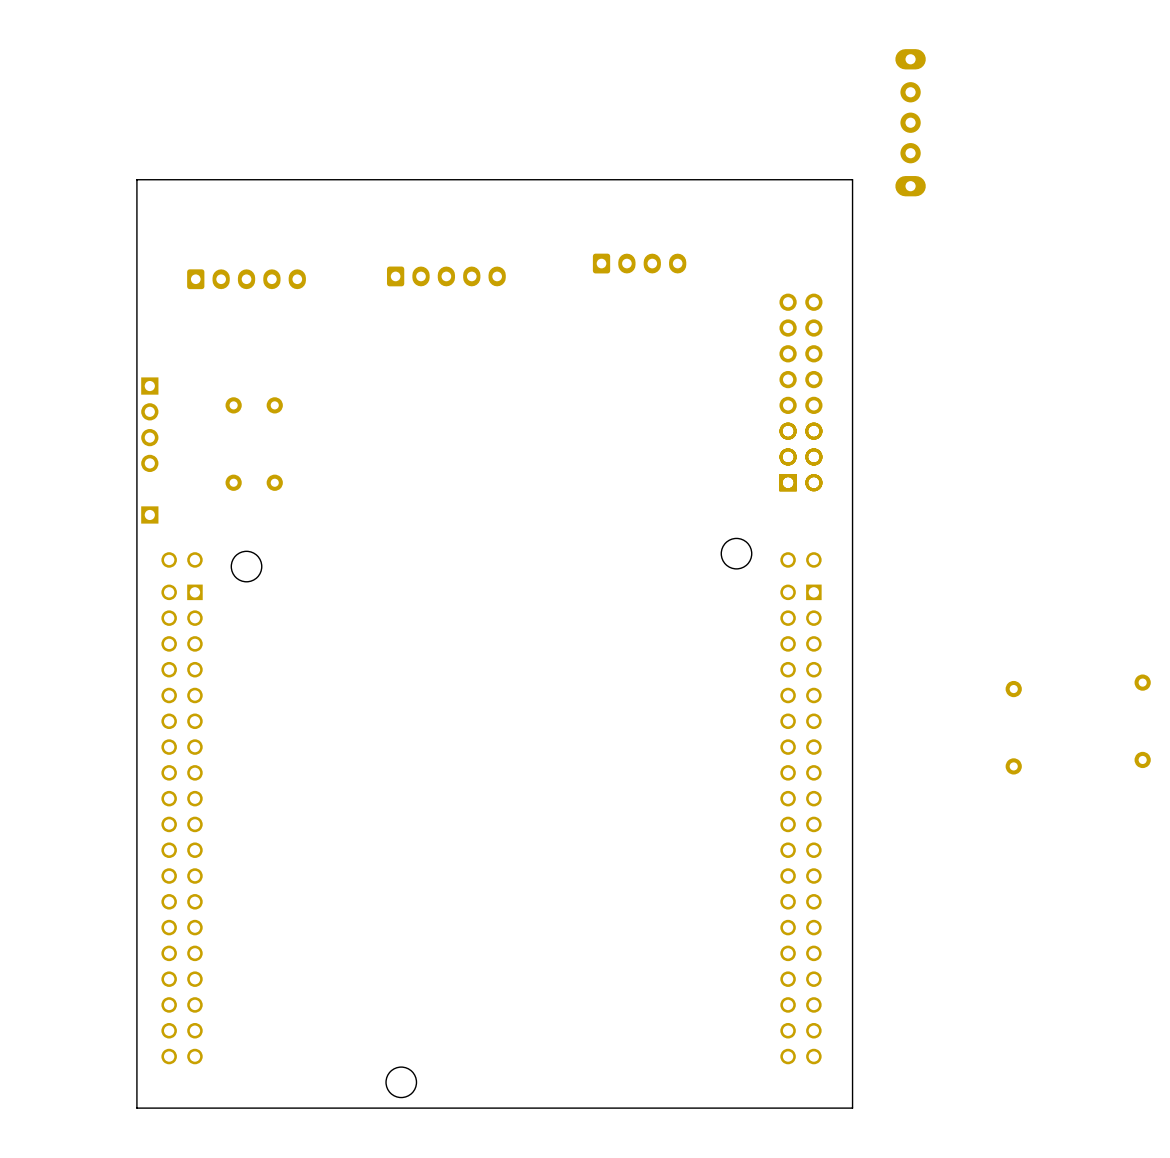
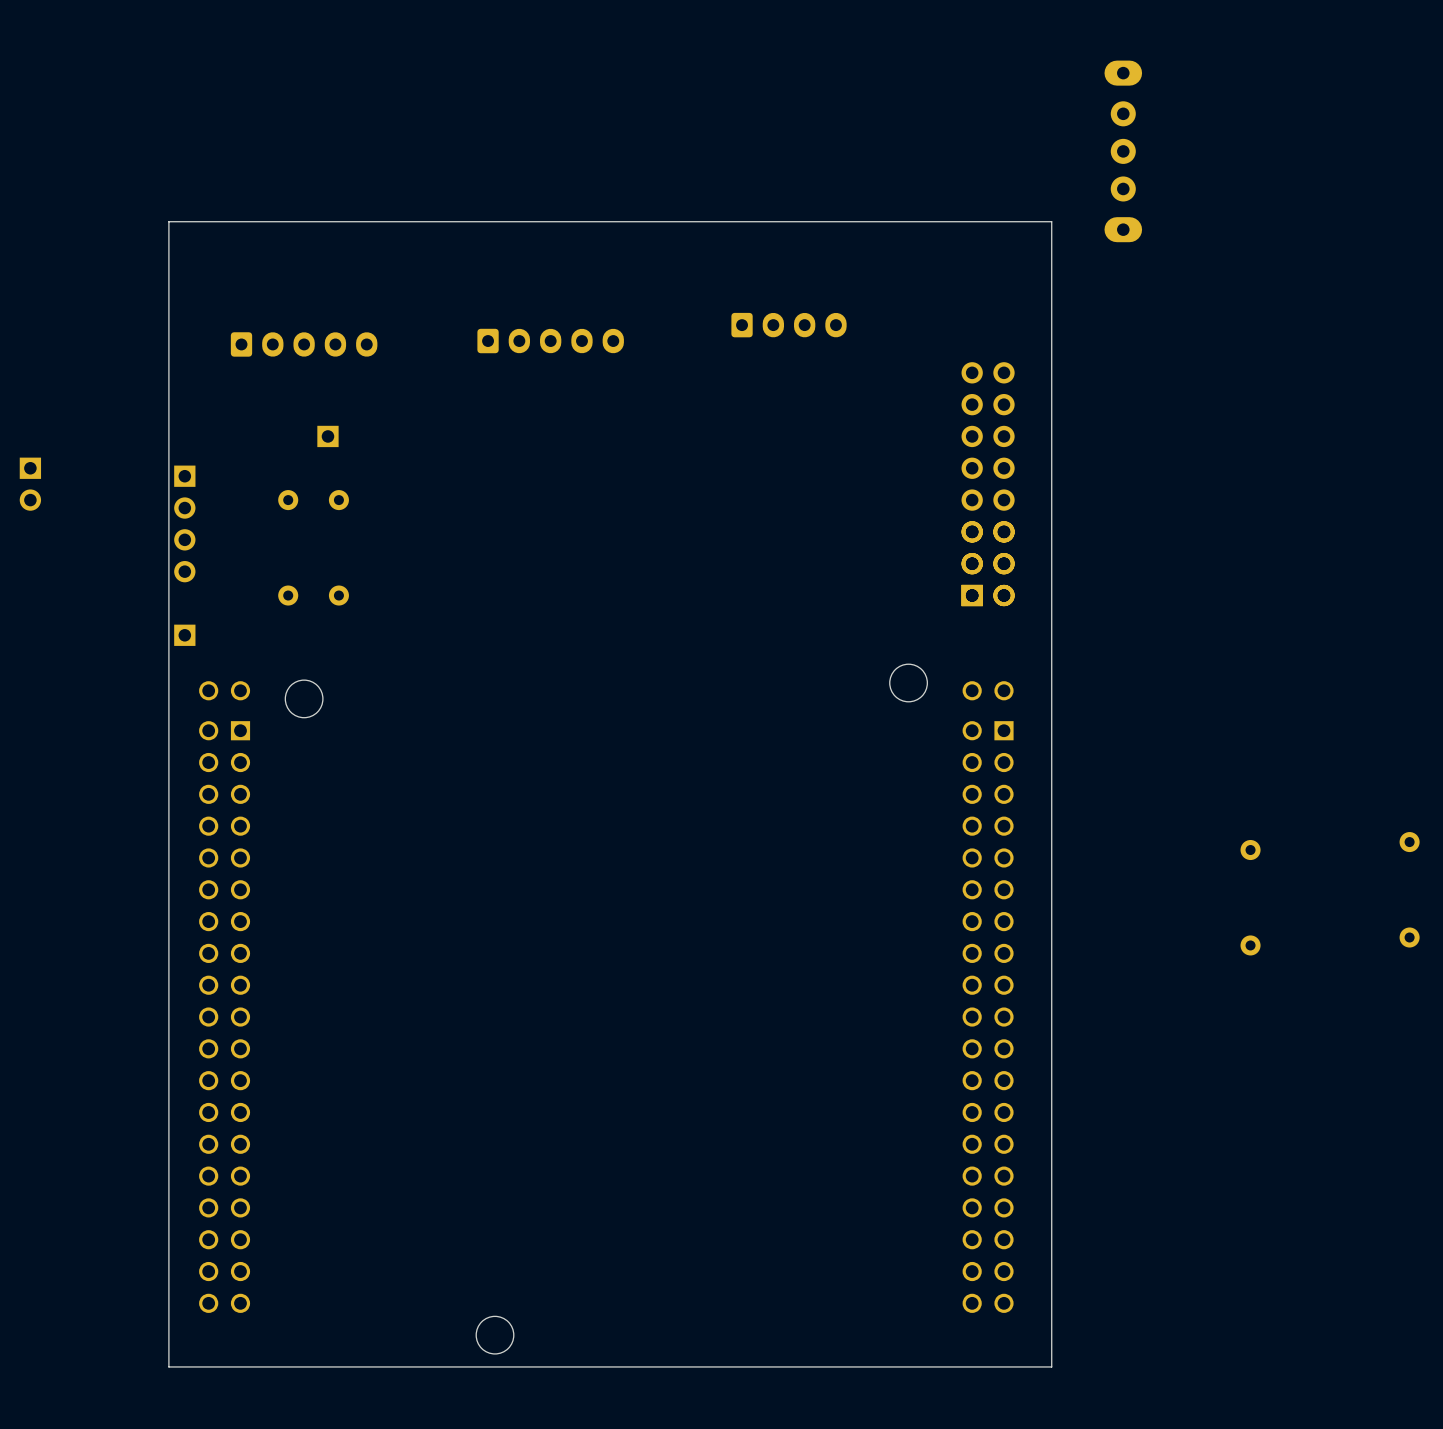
part: none -> (327, 436)
part: none -> (30, 484)

